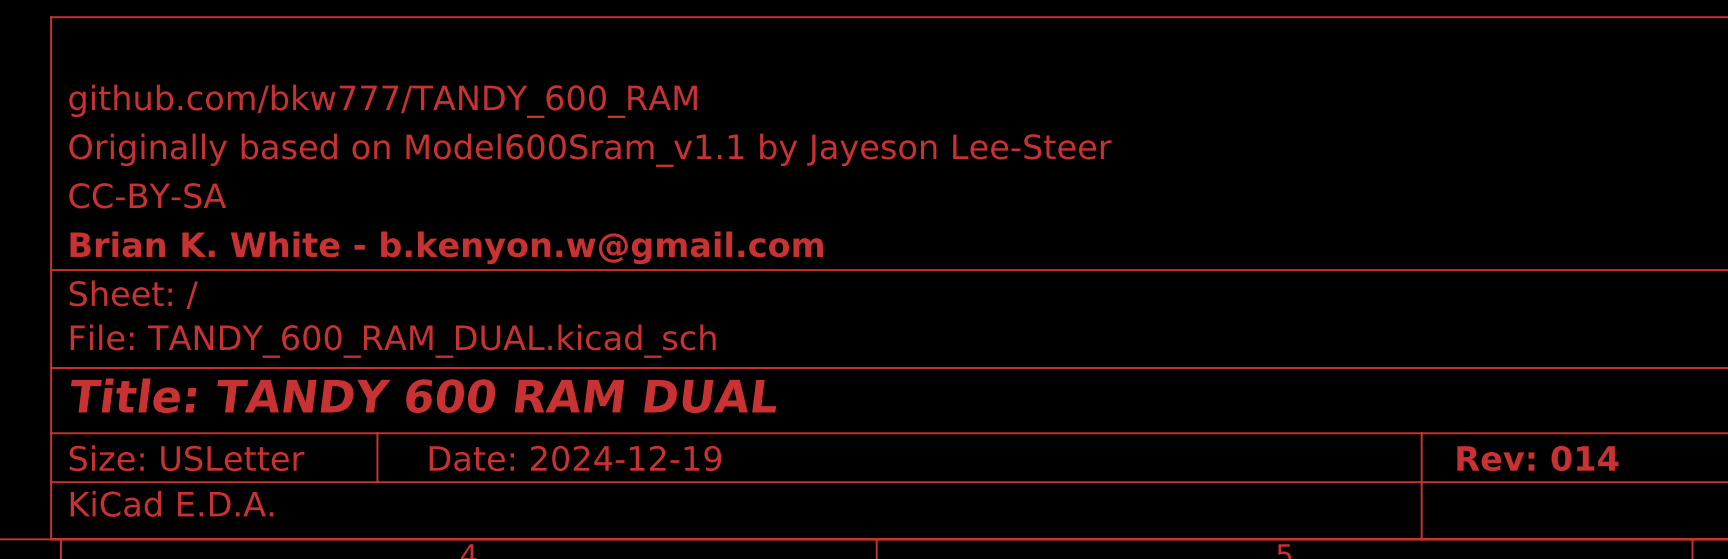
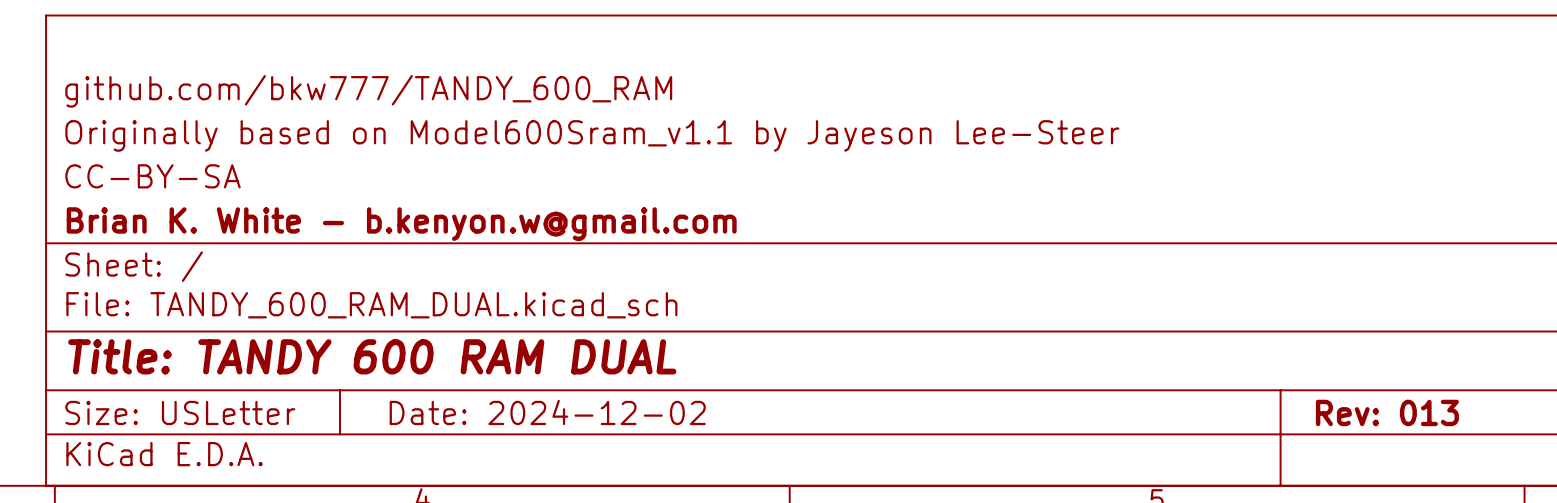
title block: Date: 2024-12-19 (575, 458) -> Date: 2024-12-02 (547, 412)
title block: Rev: 014 (1537, 458) -> Rev: 013 (1387, 412)

